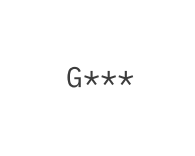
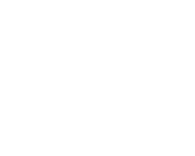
G***: (100, 77) -> none

